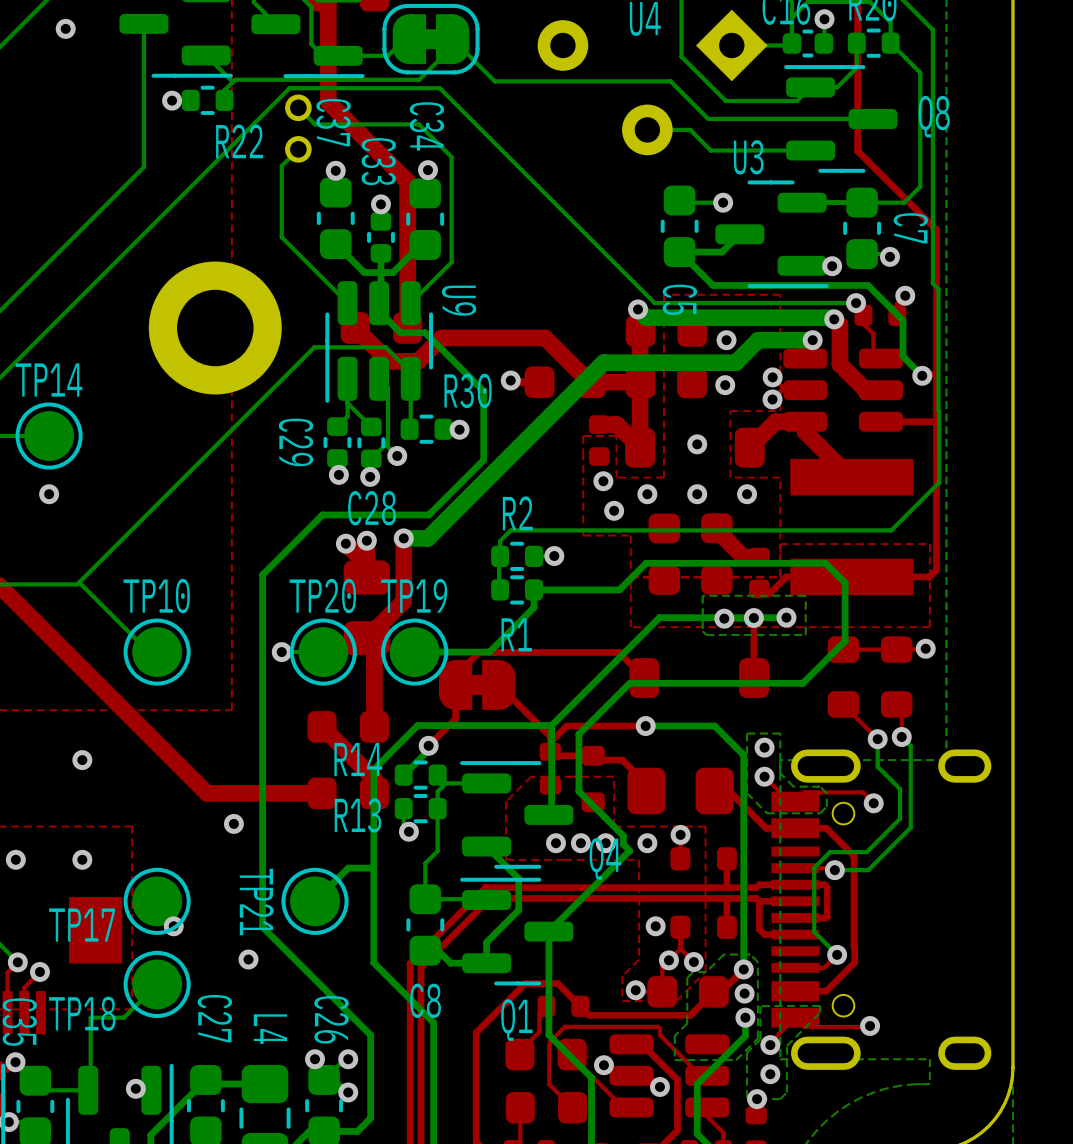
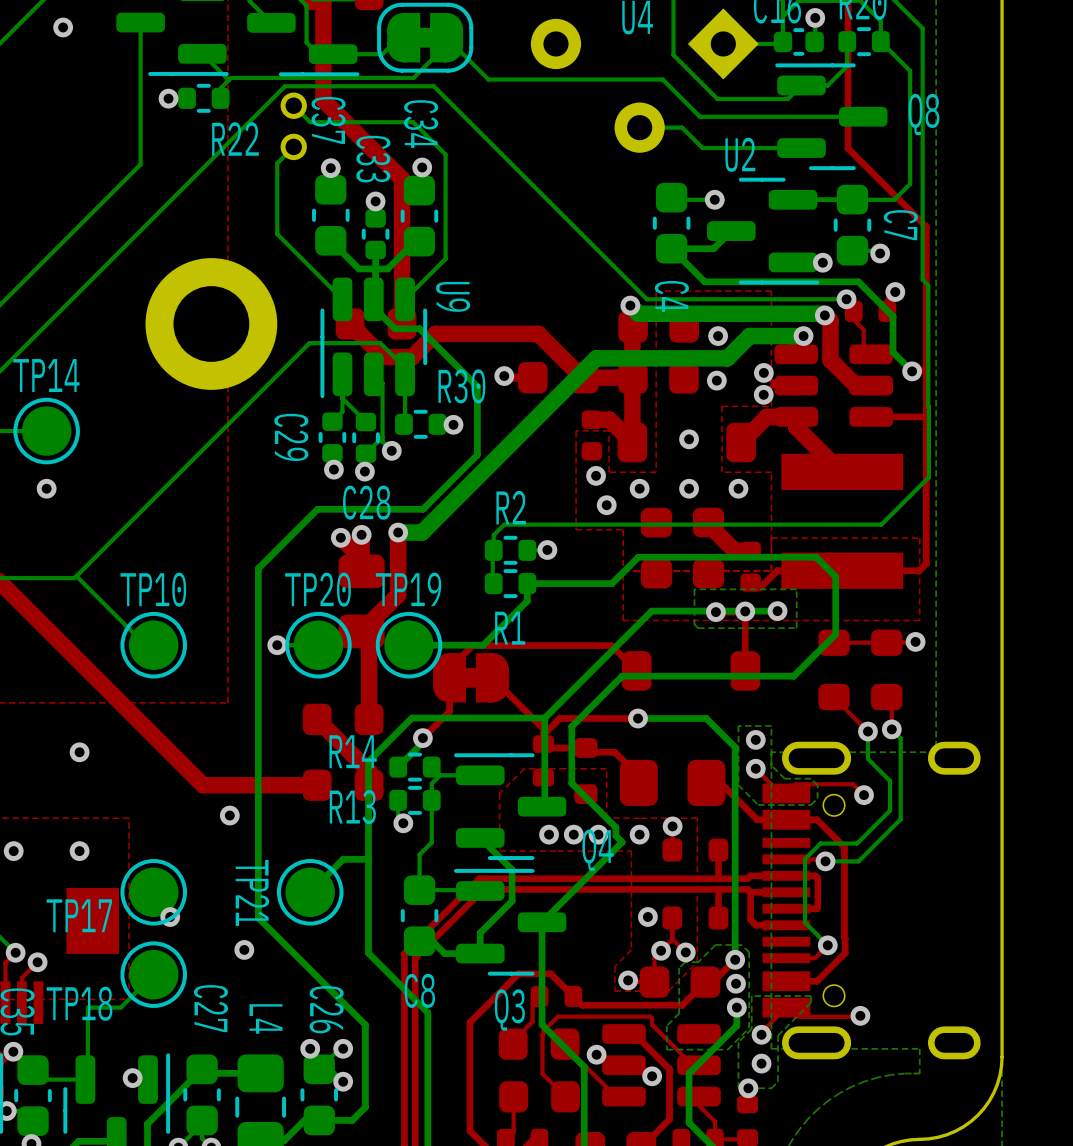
U3 name: U3 (748, 157) -> U2 (740, 154)
C5 name: C5 (679, 299) -> C4 (671, 296)
Q1 name: Q1 (516, 1020) -> Q3 (509, 1009)

